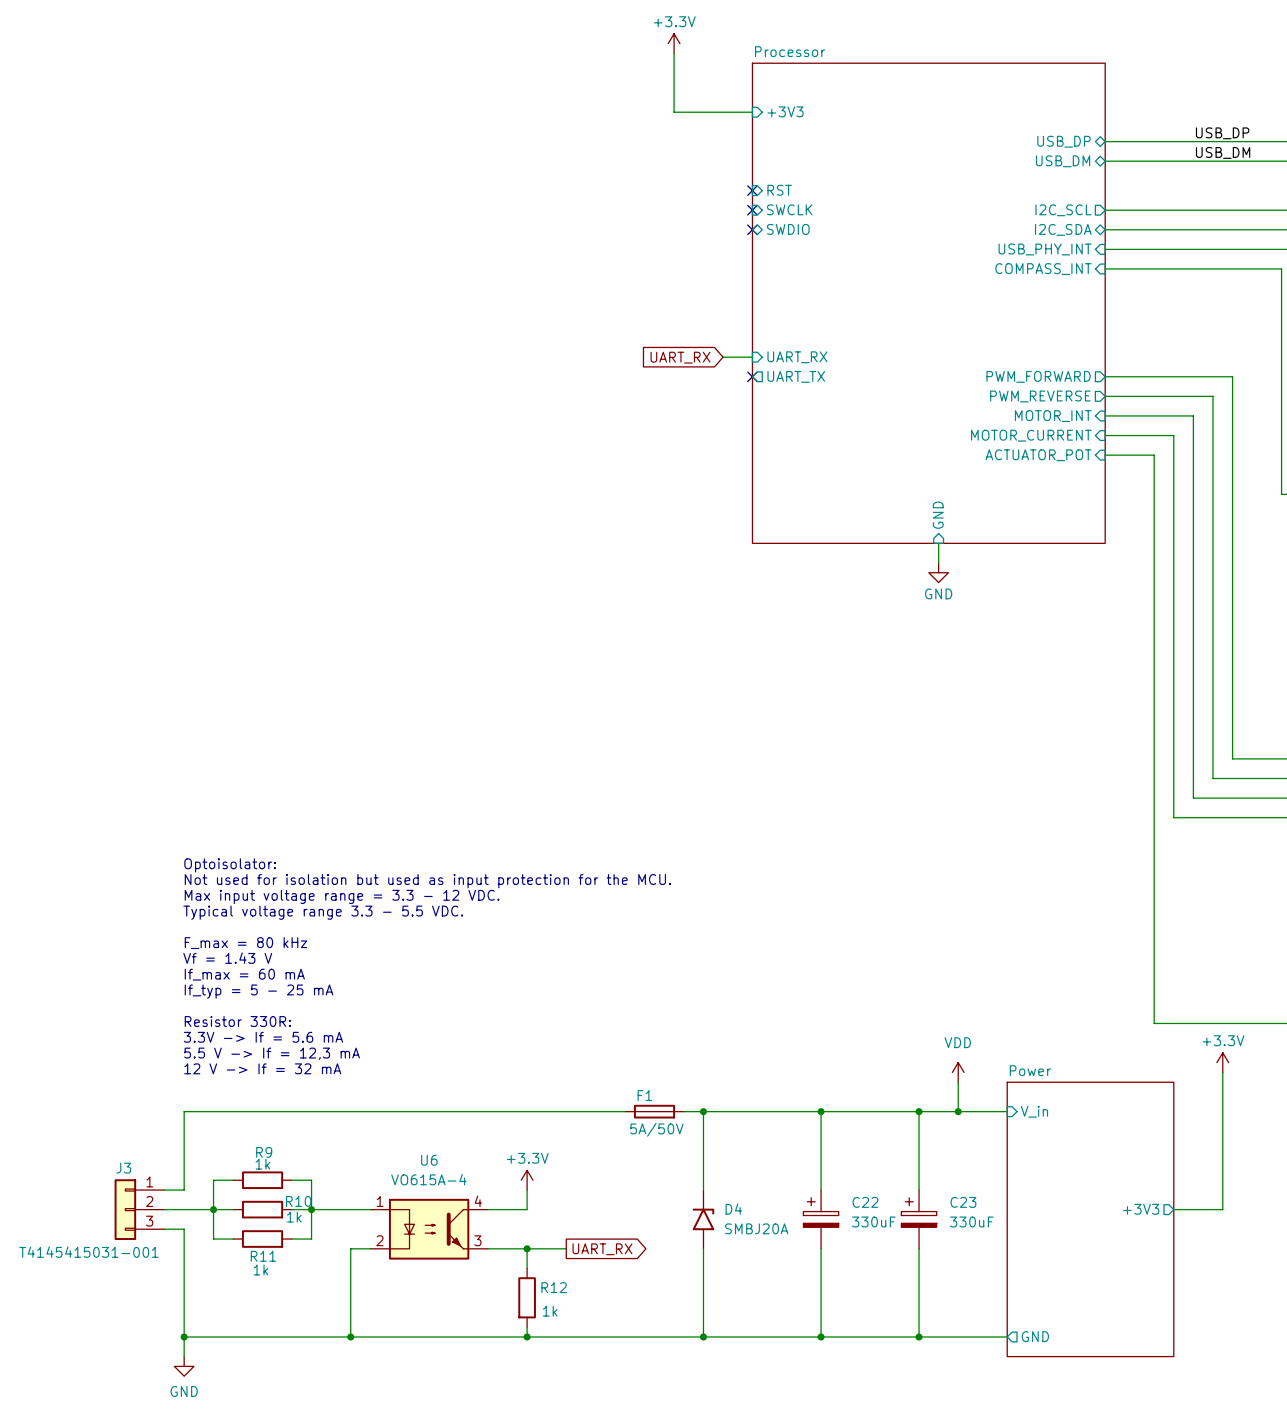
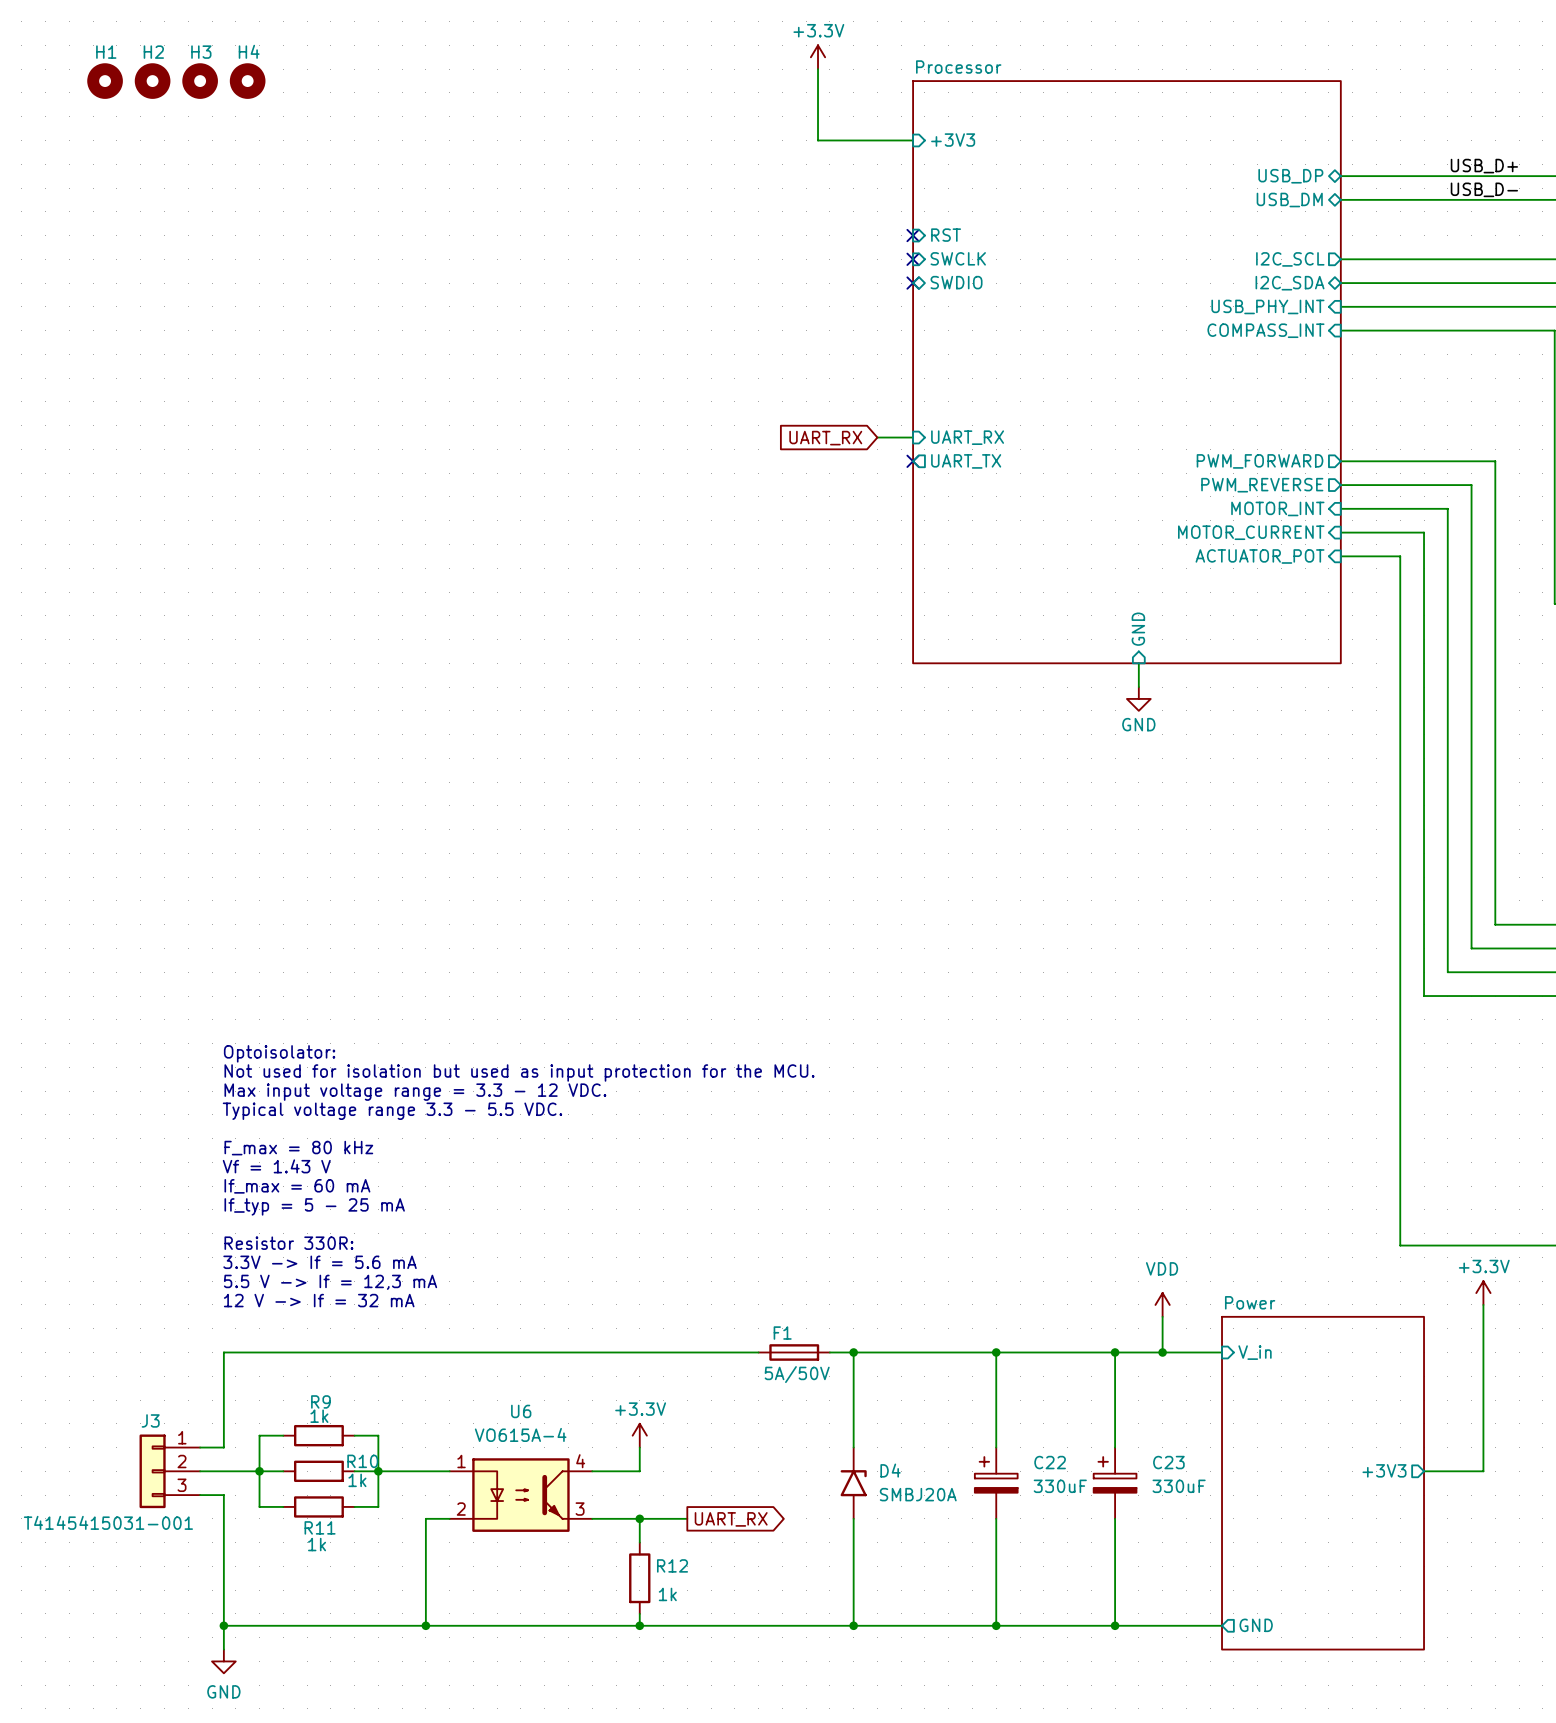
H1: none -> (105, 81)
H2: none -> (152, 81)
H3: none -> (200, 81)
H4: none -> (247, 81)
label: USB_DP (1222, 133) -> USB_D+ (1484, 166)
label: USB_DM (1223, 152) -> USB_D- (1484, 189)

